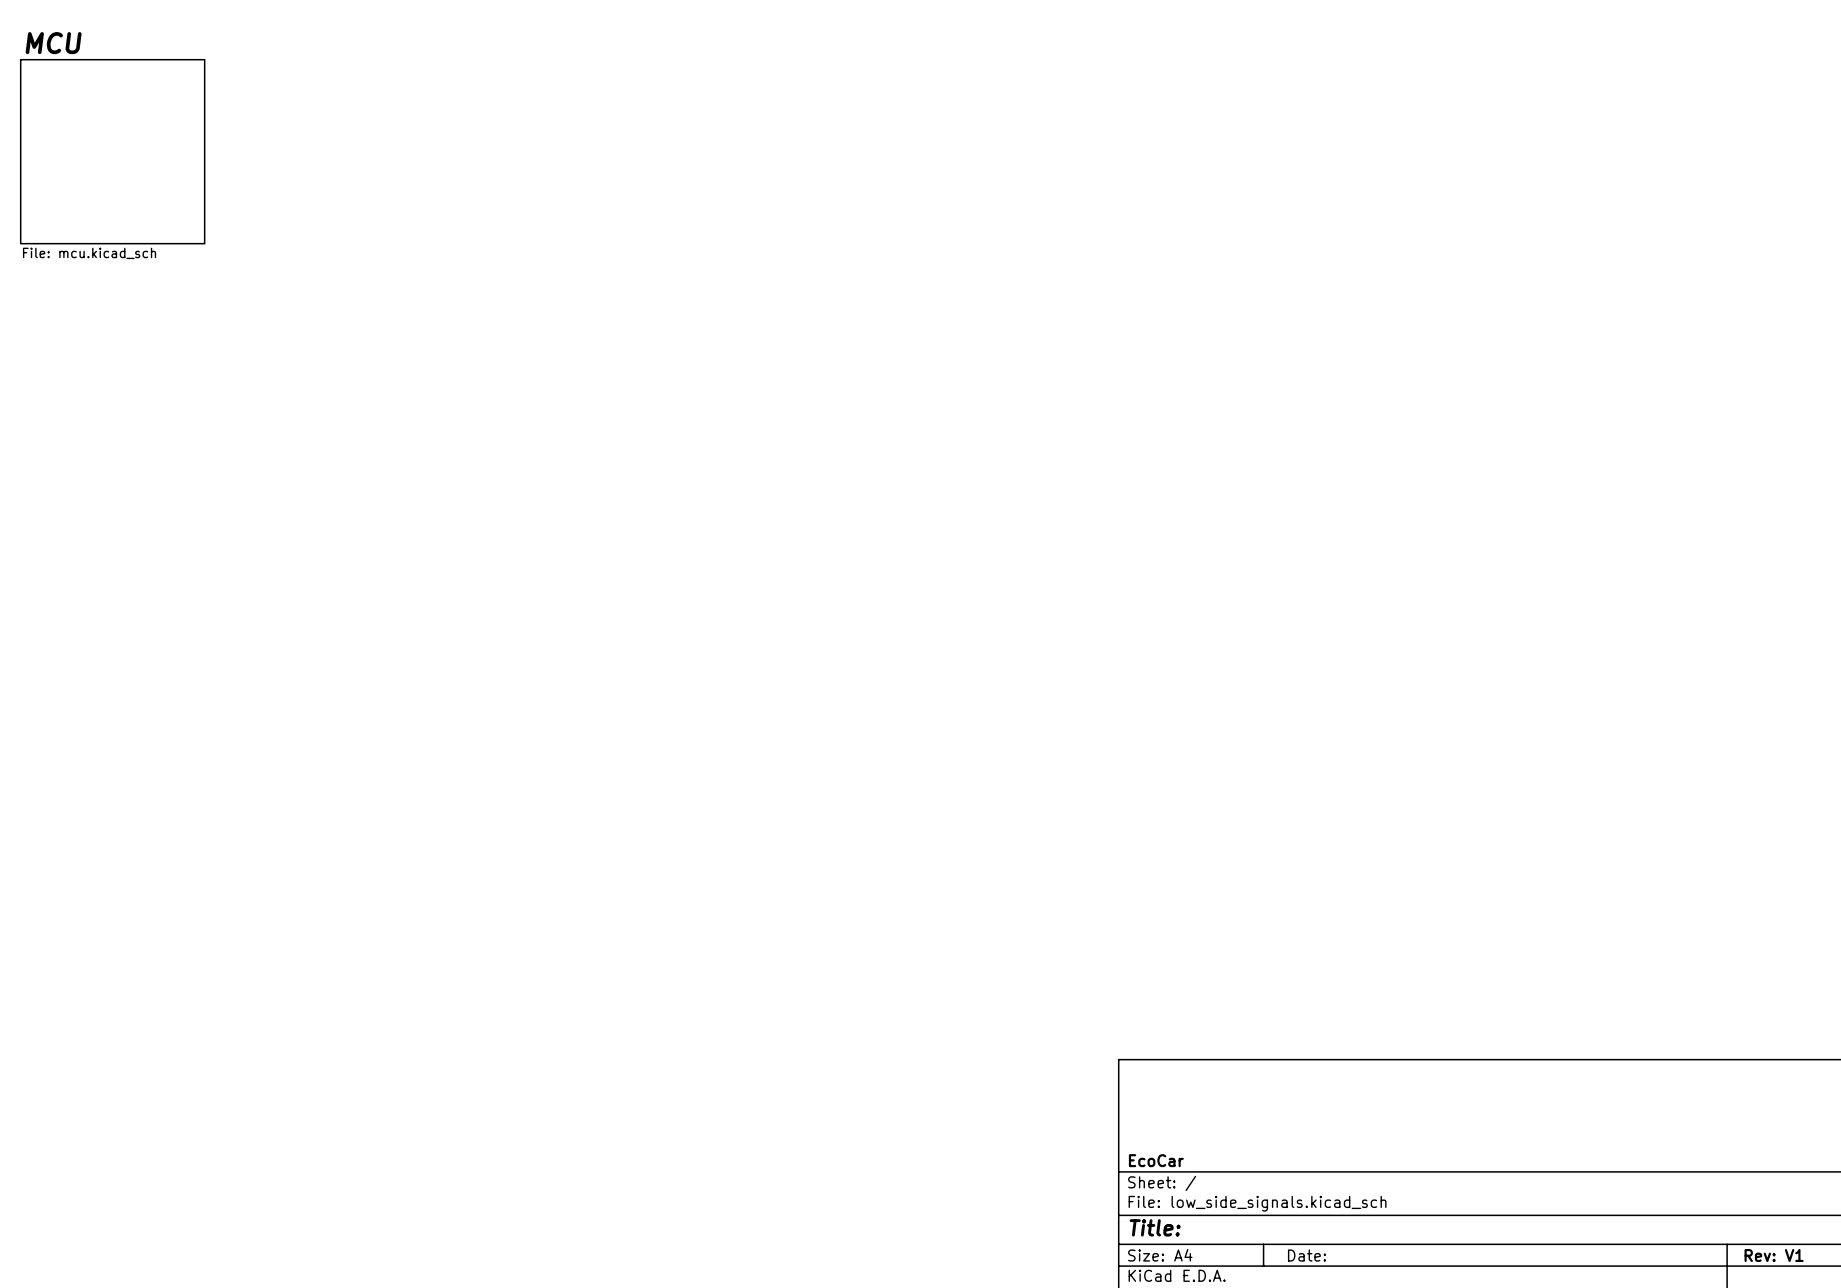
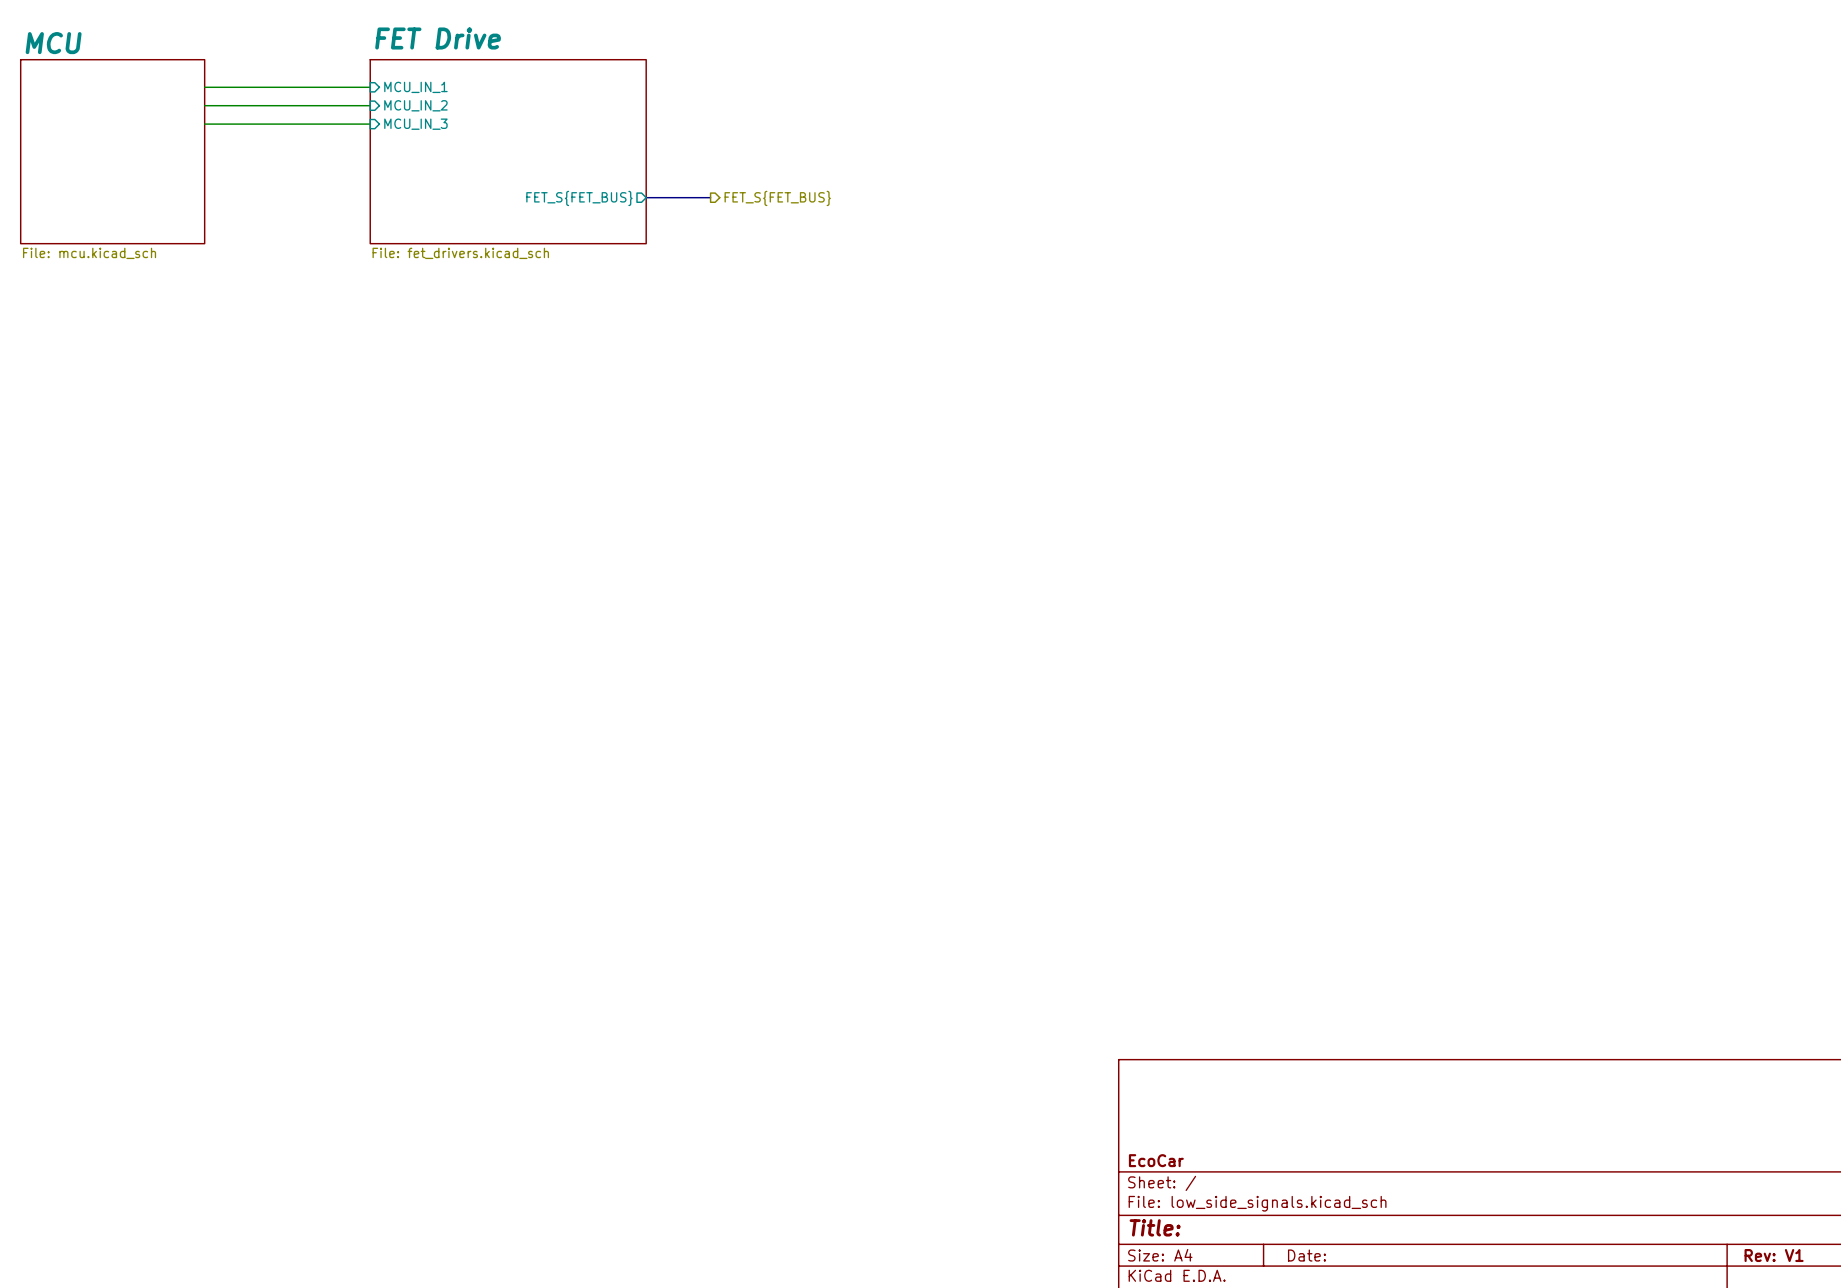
wire: none -> (204, 87) (370, 87)
sheet pin: none -> MCU_IN_1 (415, 87)
wire: none -> (204, 105) (370, 105)
sheet pin: none -> MCU_IN_2 (415, 105)
wire: none -> (204, 124) (370, 124)
sheet pin: none -> MCU_IN_3 (415, 124)
sheet FET Drive: none -> File: fet_drivers.kicad_sch (508, 151)
bus: none -> (646, 197) (710, 197)
sheet pin: none -> FET_S{FET_BUS} (579, 198)
hierarchical label: none -> FET_S{FET_BUS} (777, 198)

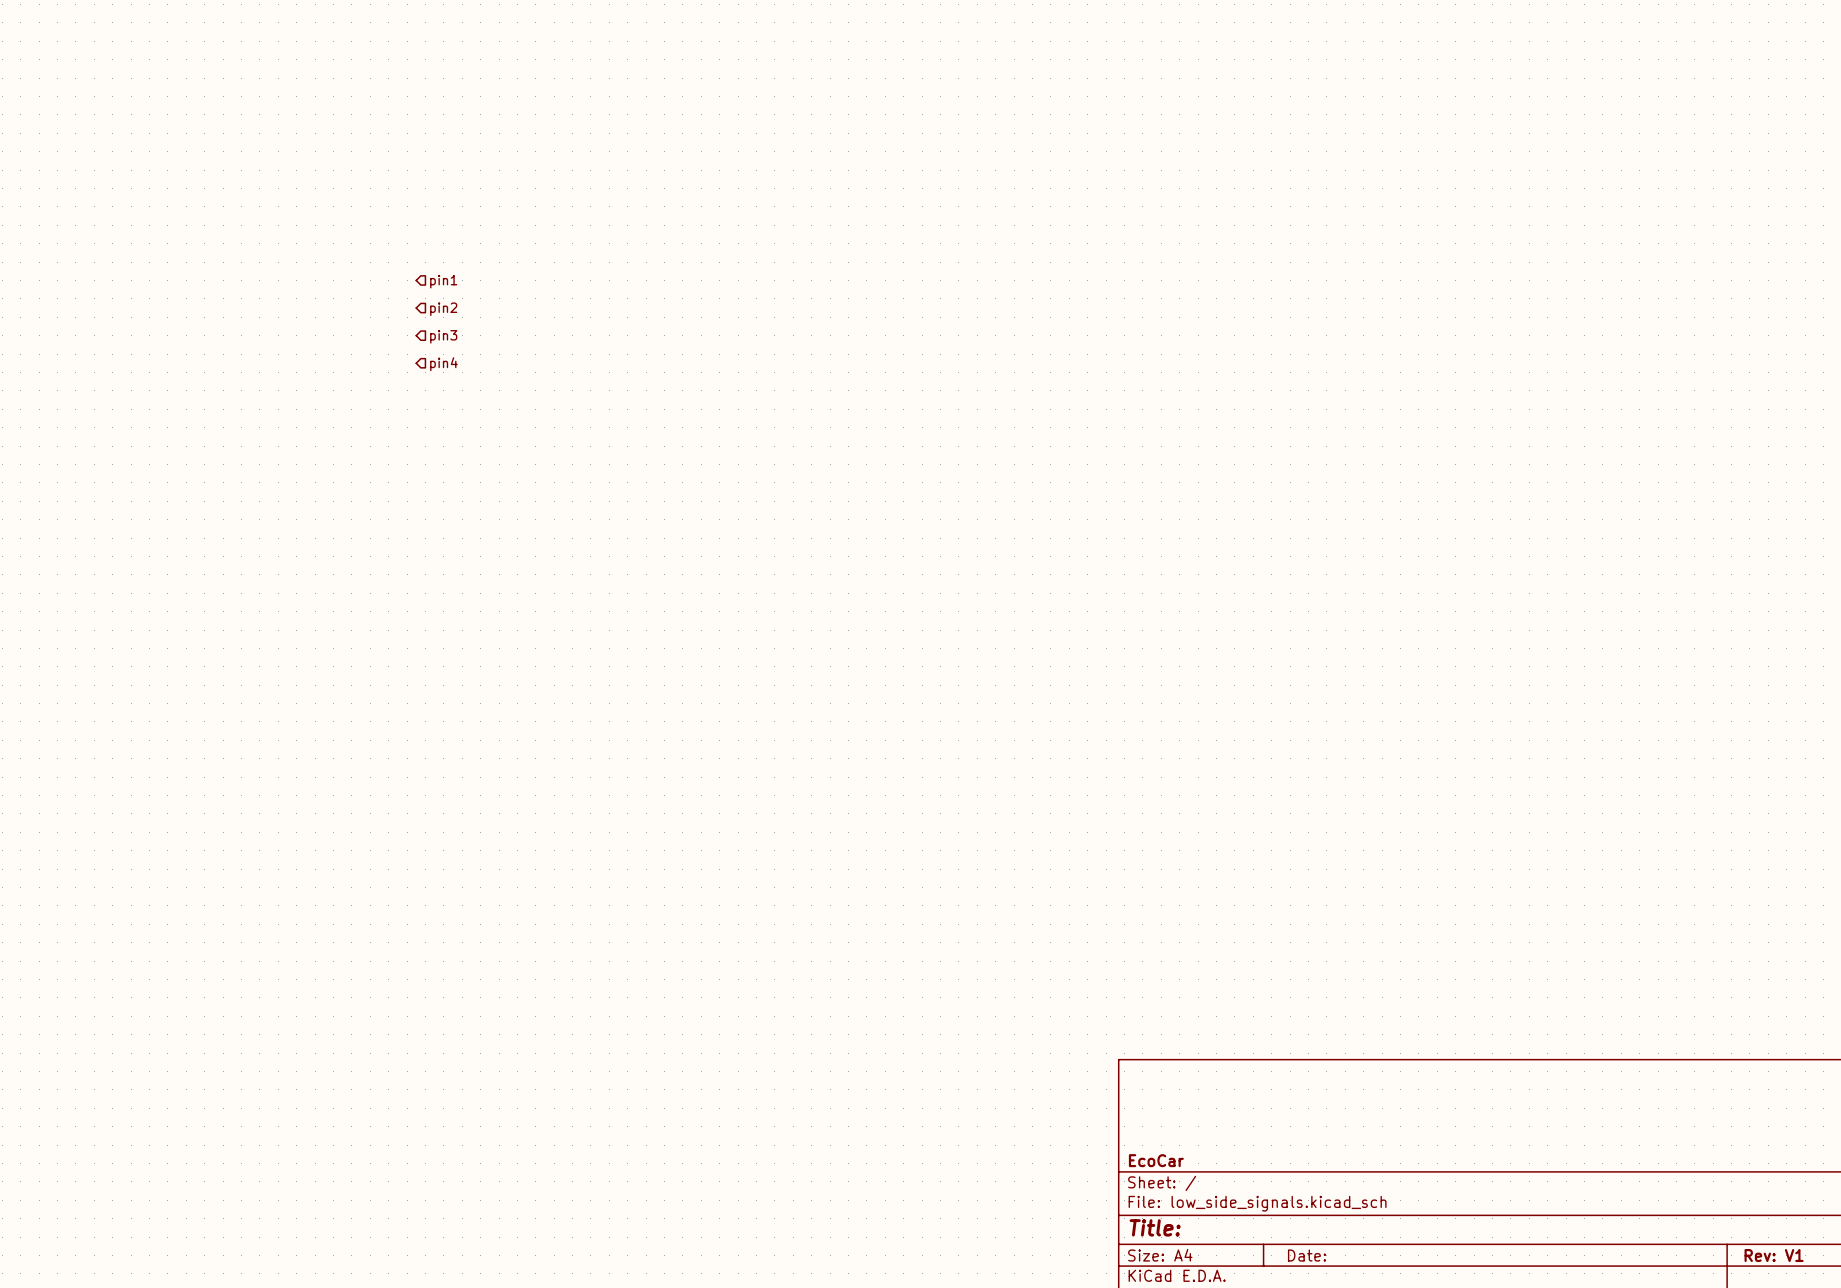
wire: (204, 87) (370, 87) -> none
sheet pin: MCU_IN_1 (415, 87) -> none
wire: (204, 105) (370, 105) -> none
sheet pin: MCU_IN_2 (415, 105) -> none
wire: (204, 124) (370, 124) -> none
sheet pin: MCU_IN_3 (415, 124) -> none
sheet MCU: File: mcu.kicad_sch (112, 151) -> none
sheet FET Drive: File: fet_drivers.kicad_sch (508, 151) -> none
bus: (646, 197) (710, 197) -> none
sheet pin: FET_S{FET_BUS} (579, 198) -> none
hierarchical label: FET_S{FET_BUS} (777, 198) -> none
hierarchical label: none -> pin1 (443, 281)
hierarchical label: none -> pin2 (443, 309)
hierarchical label: none -> pin3 (443, 336)
hierarchical label: none -> pin4 (443, 364)

